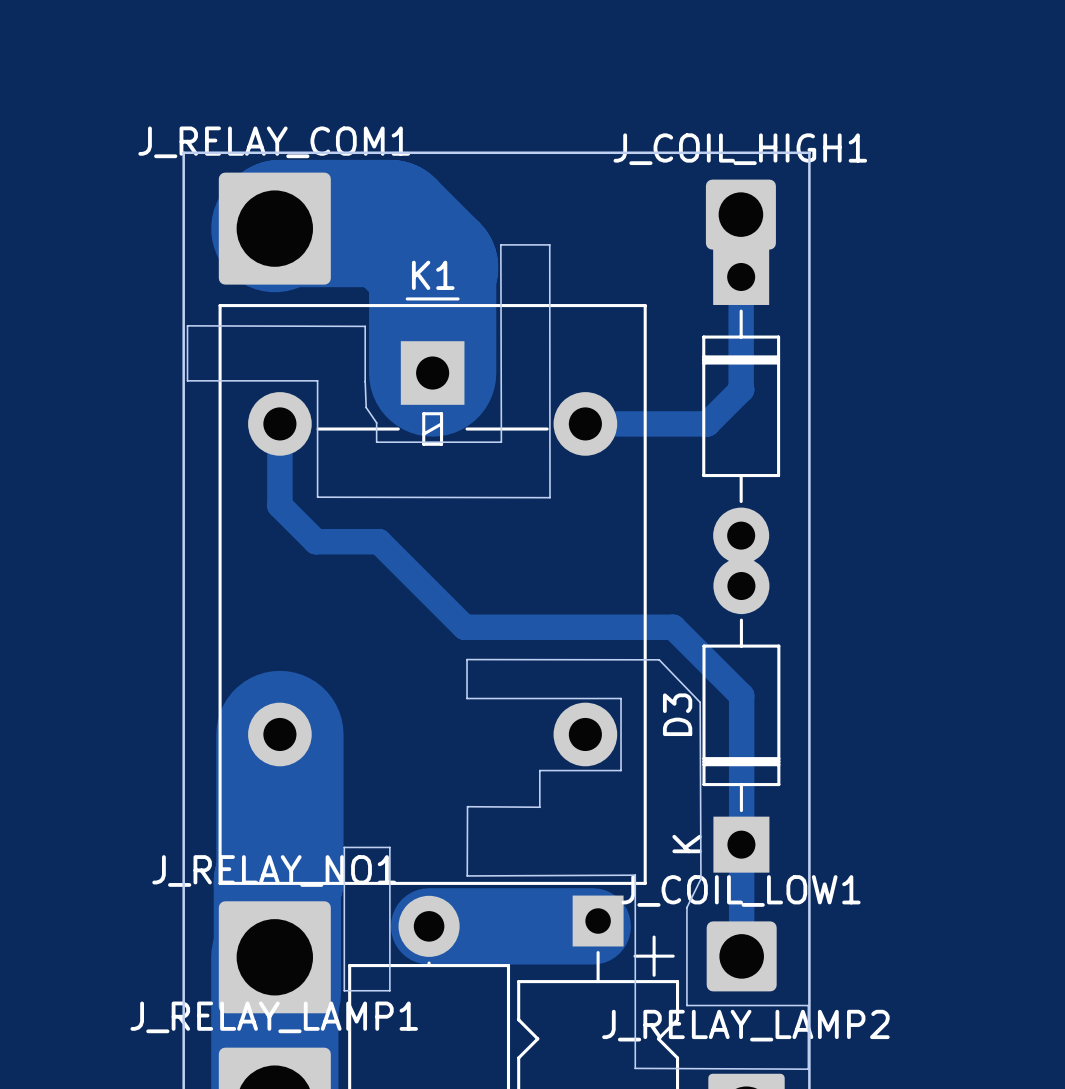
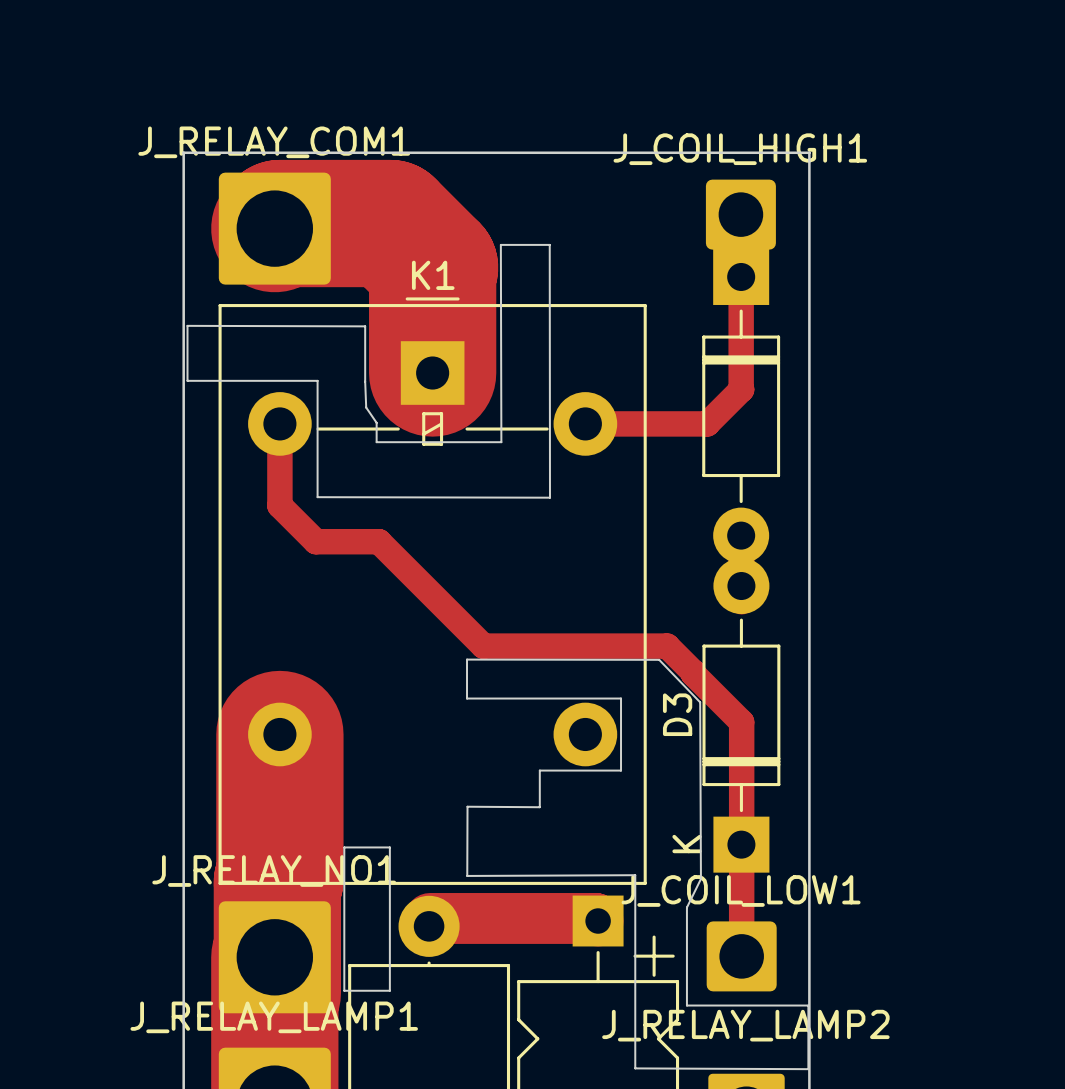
track: (464, 627) (673, 627) (741, 695) (741, 722) -> (464, 627) (483, 646) (667, 646) (741, 722)
track: none -> (430, 918) (595, 918)
track: (598, 921) (592, 926) (429, 926) -> none

